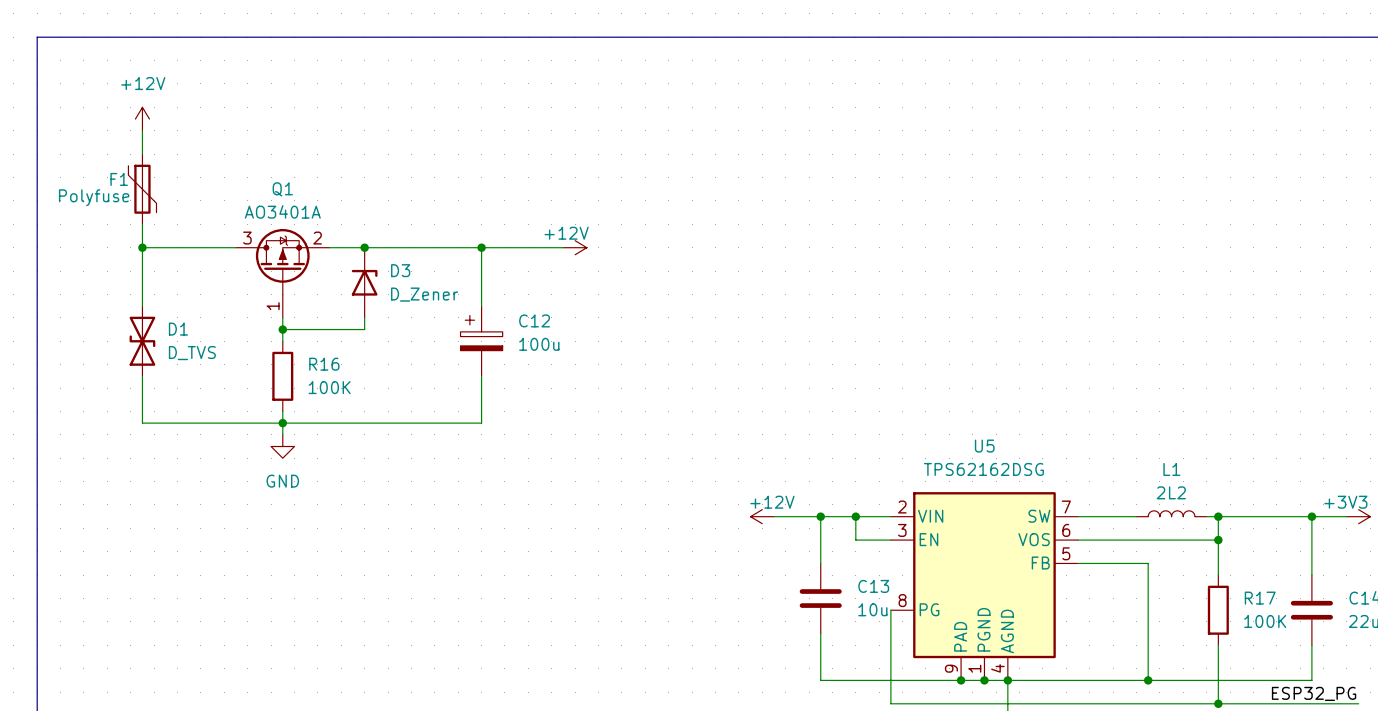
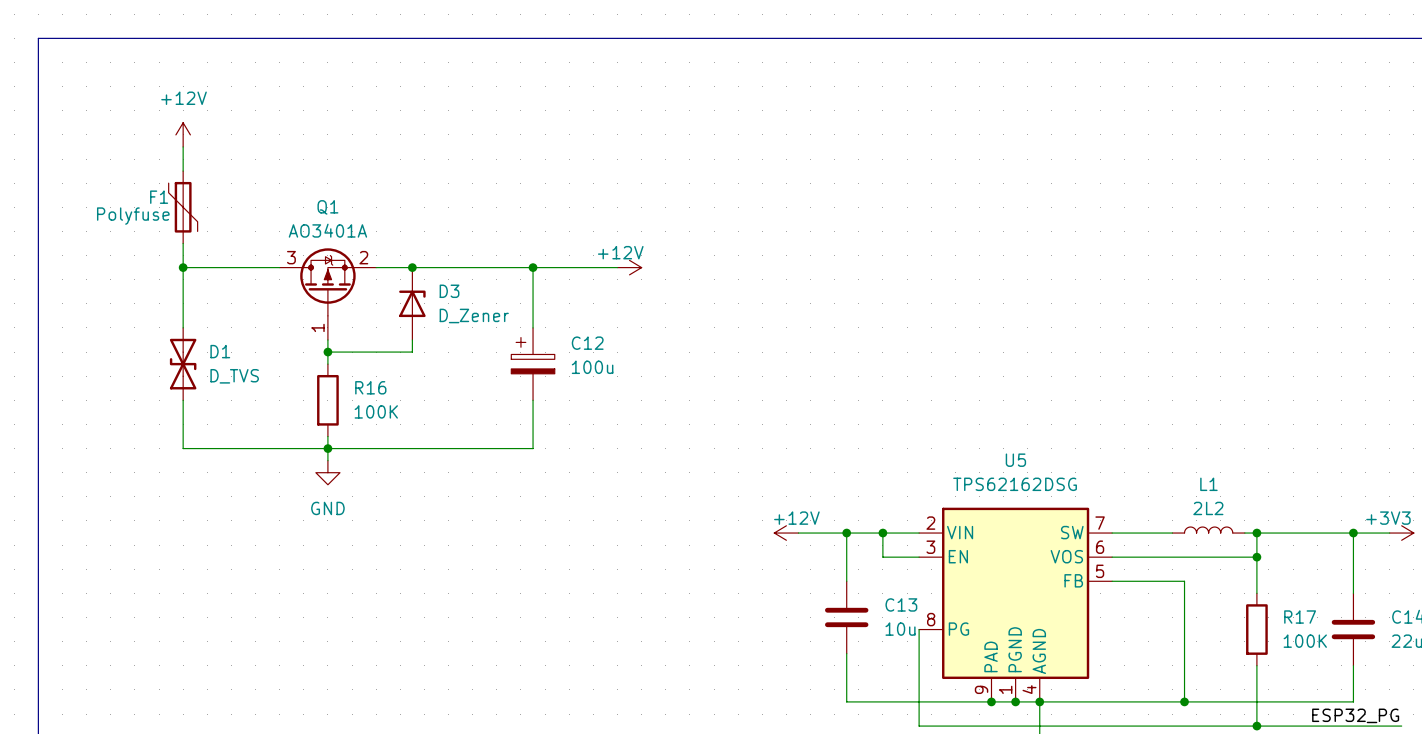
power symbol position: +12V (142, 119) -> +12V (183, 134)
wire: (142, 130) (142, 154) -> (183, 146) (183, 171)
F1 position: (142, 189) -> (183, 207)
wire: (142, 224) (142, 306) -> (183, 243) (183, 327)
wire: (142, 247) (236, 247) -> (183, 267) (279, 267)
junction position: (142, 247) -> (183, 267)
wire: (329, 247) (563, 247) -> (376, 267) (617, 267)
junction position: (364, 247) -> (412, 267)
wire: (481, 247) (481, 306) -> (533, 267) (533, 327)
junction position: (481, 247) -> (533, 267)
power symbol position: +12V (575, 247) -> +12V (629, 267)
Q1 position: (282, 273) -> (327, 294)
D3 position: (364, 282) -> (412, 303)
wire: (282, 317) (282, 341) -> (327, 339) (327, 364)
wire: (364, 317) (364, 329) (282, 329) -> (412, 339) (412, 352) (327, 352)
junction position: (282, 329) -> (327, 352)
D1 position: (142, 341) -> (183, 364)
C12 position: (481, 341) -> (533, 364)
wire: (142, 376) (142, 423) (481, 423) (481, 376) -> (183, 400) (183, 448) (533, 448) (533, 400)
R16 position: (282, 376) -> (327, 400)
wire: (282, 411) (282, 434) -> (327, 436) (327, 460)
junction position: (282, 423) -> (327, 448)
power symbol position: GND (282, 446) -> GND (327, 472)

